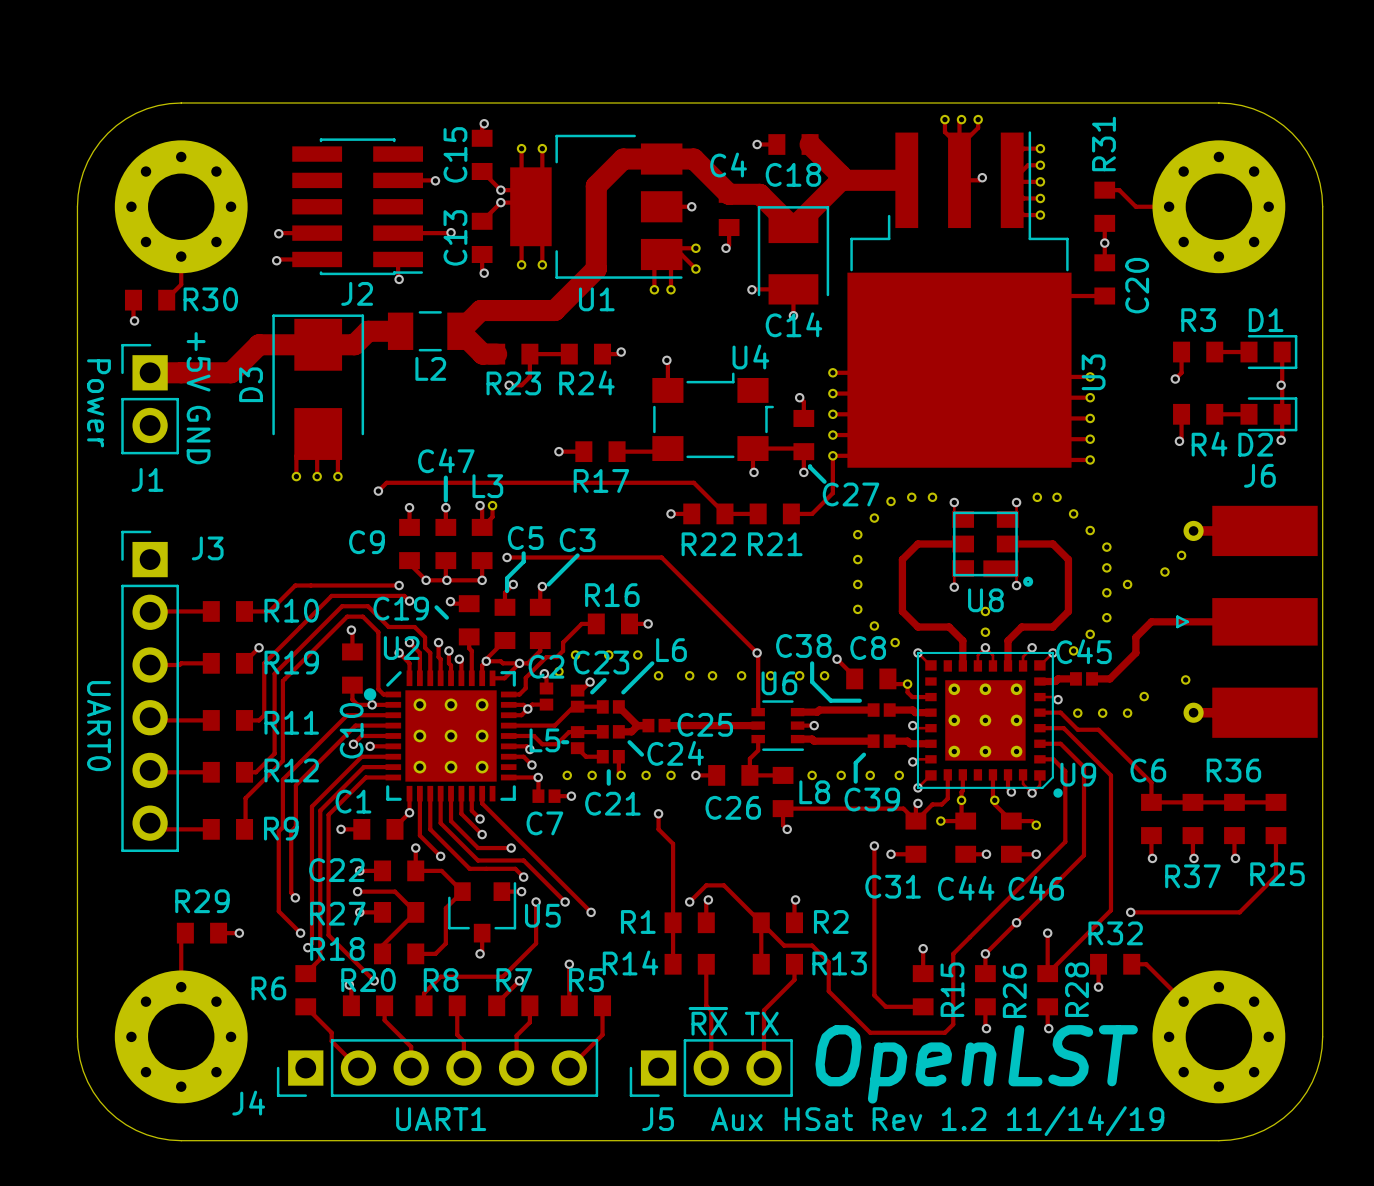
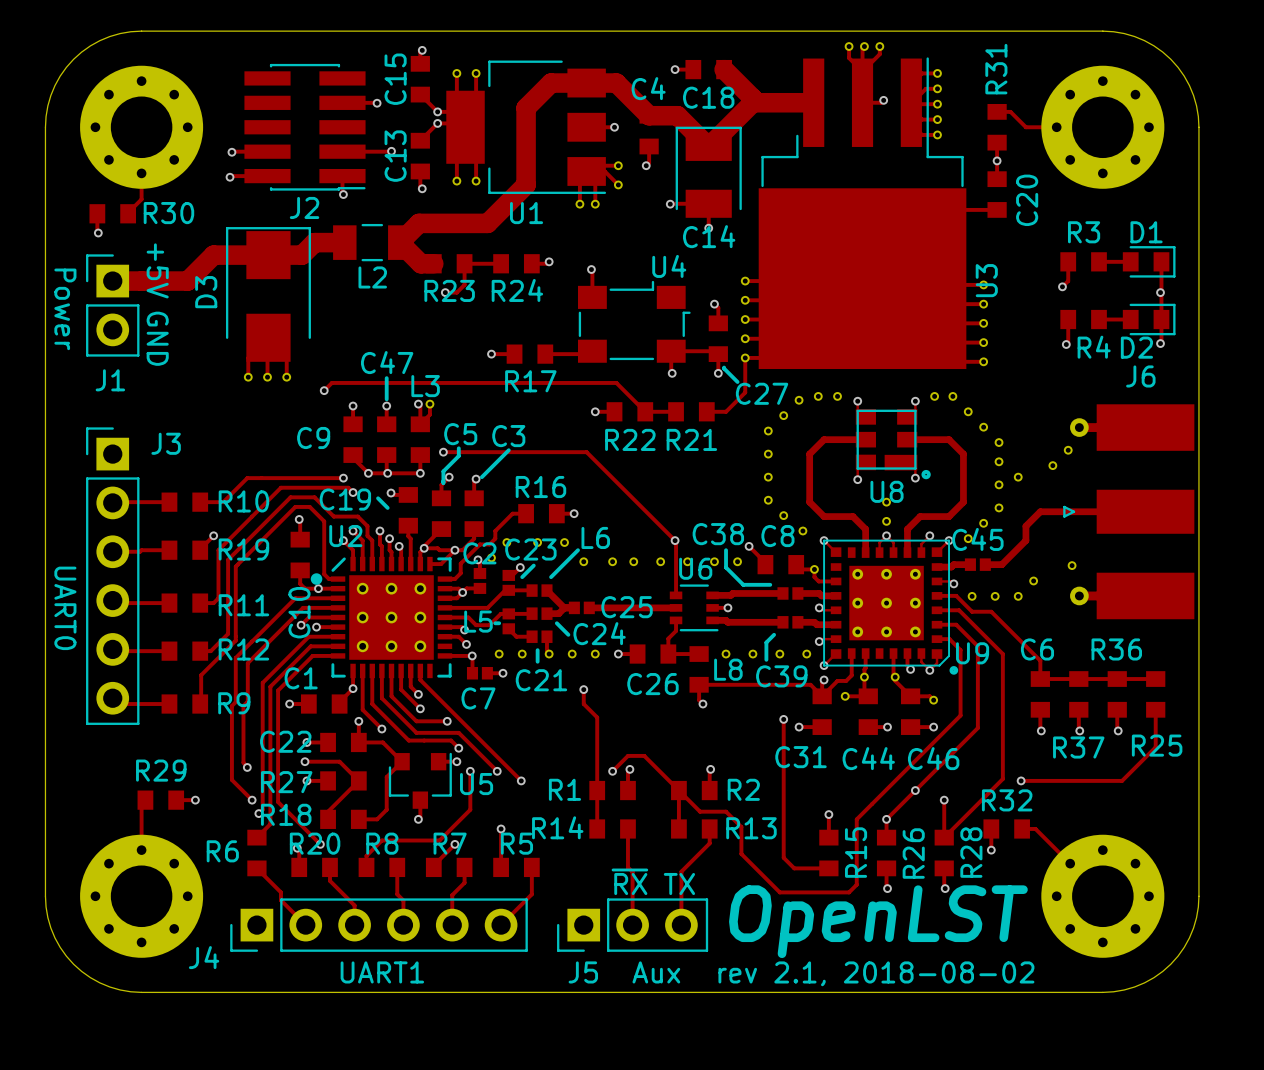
text: HSat Rev 1.2 11/14/19 (974, 1121) -> rev 2.1, 2018-08-02 (876, 973)

